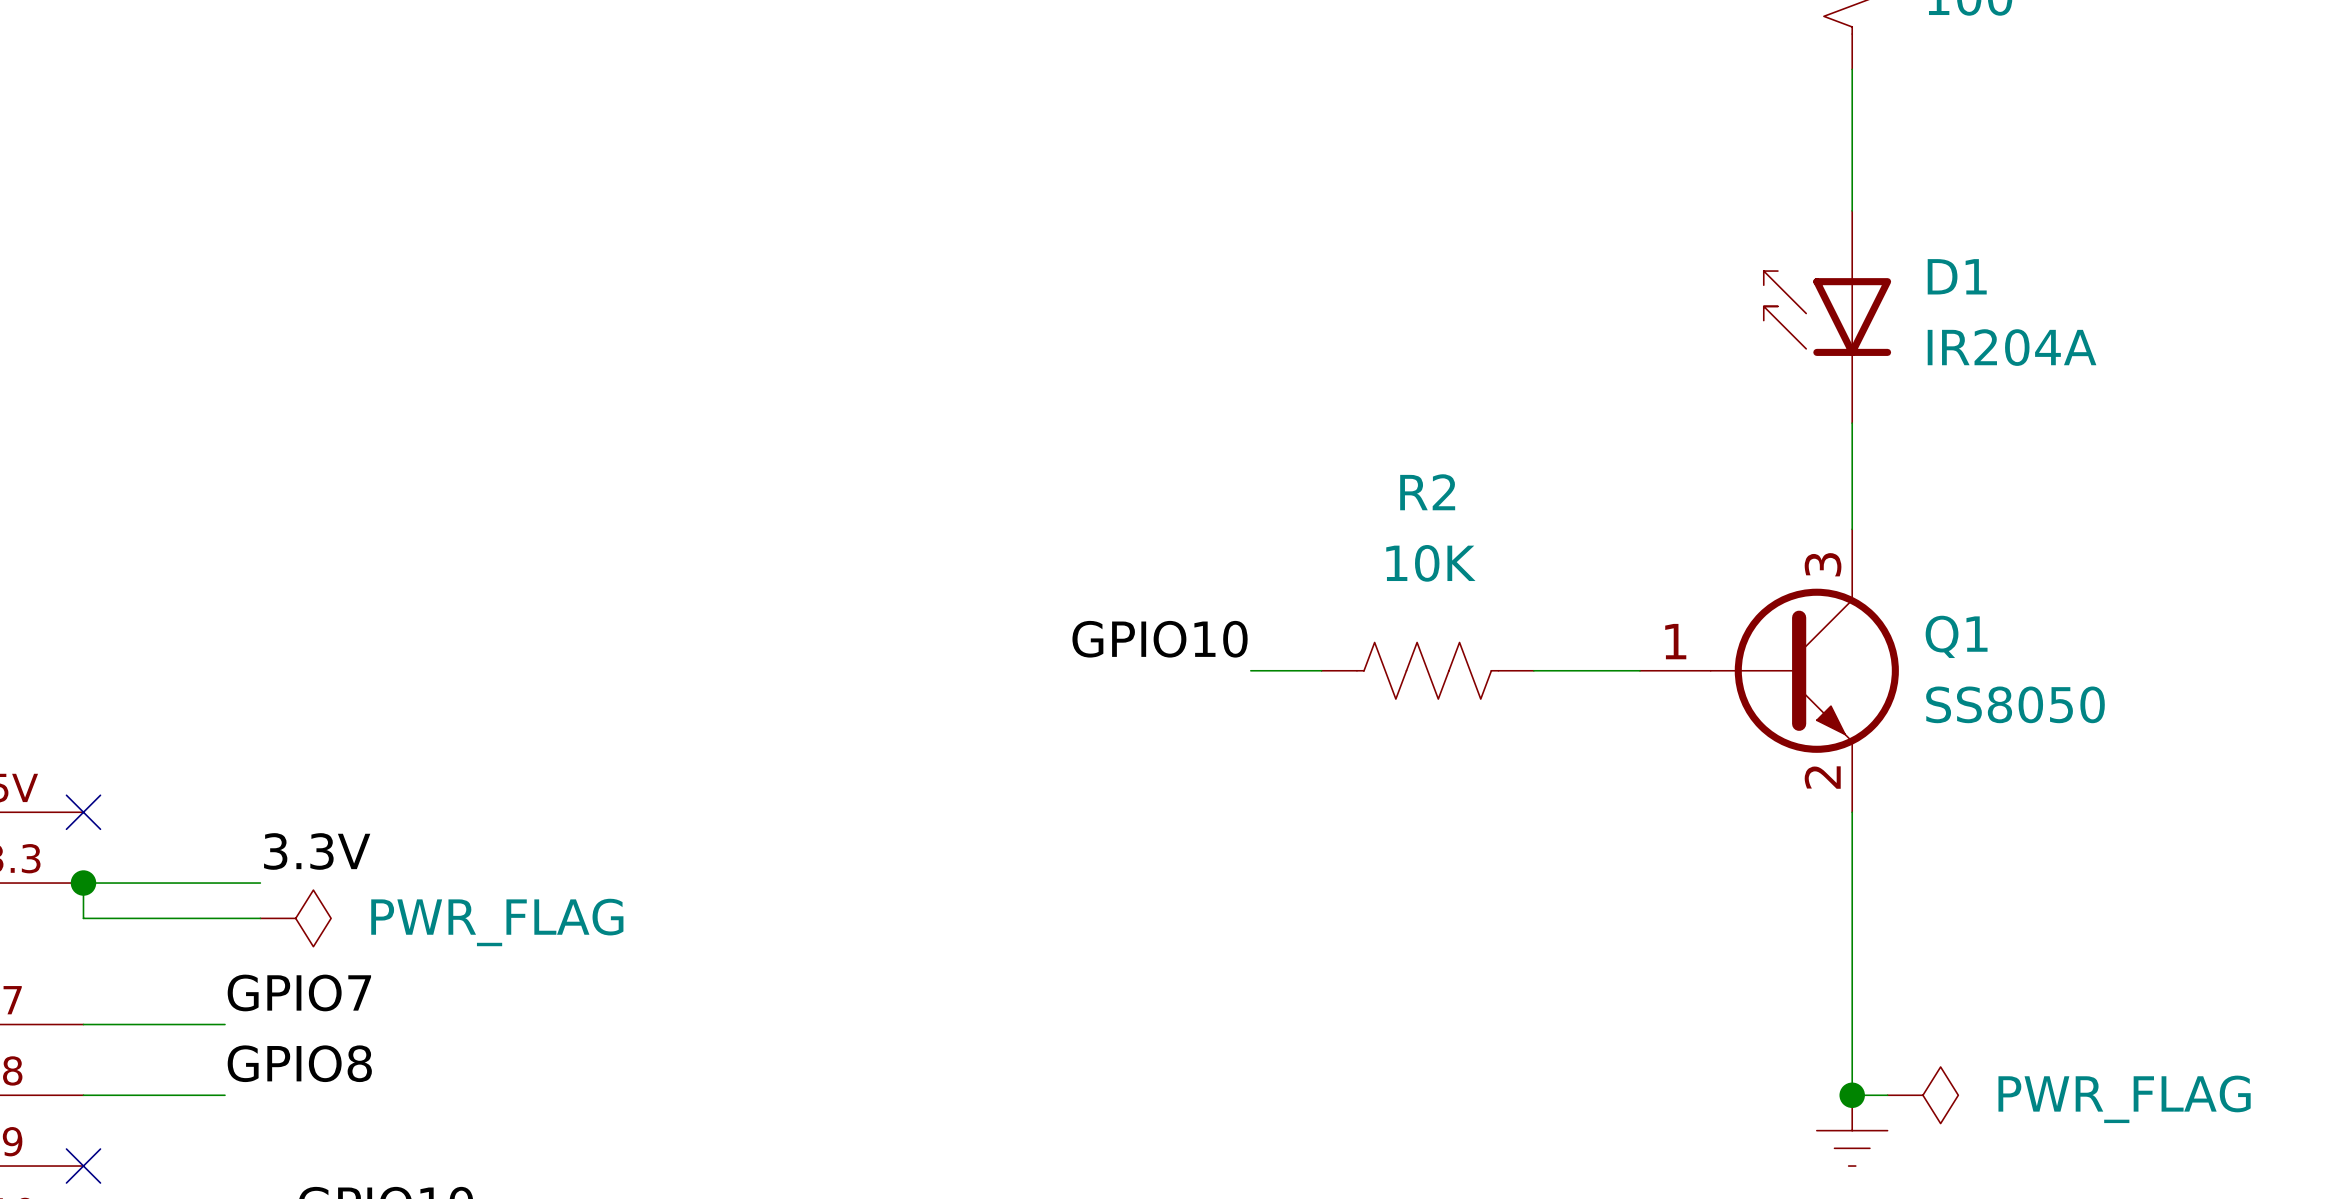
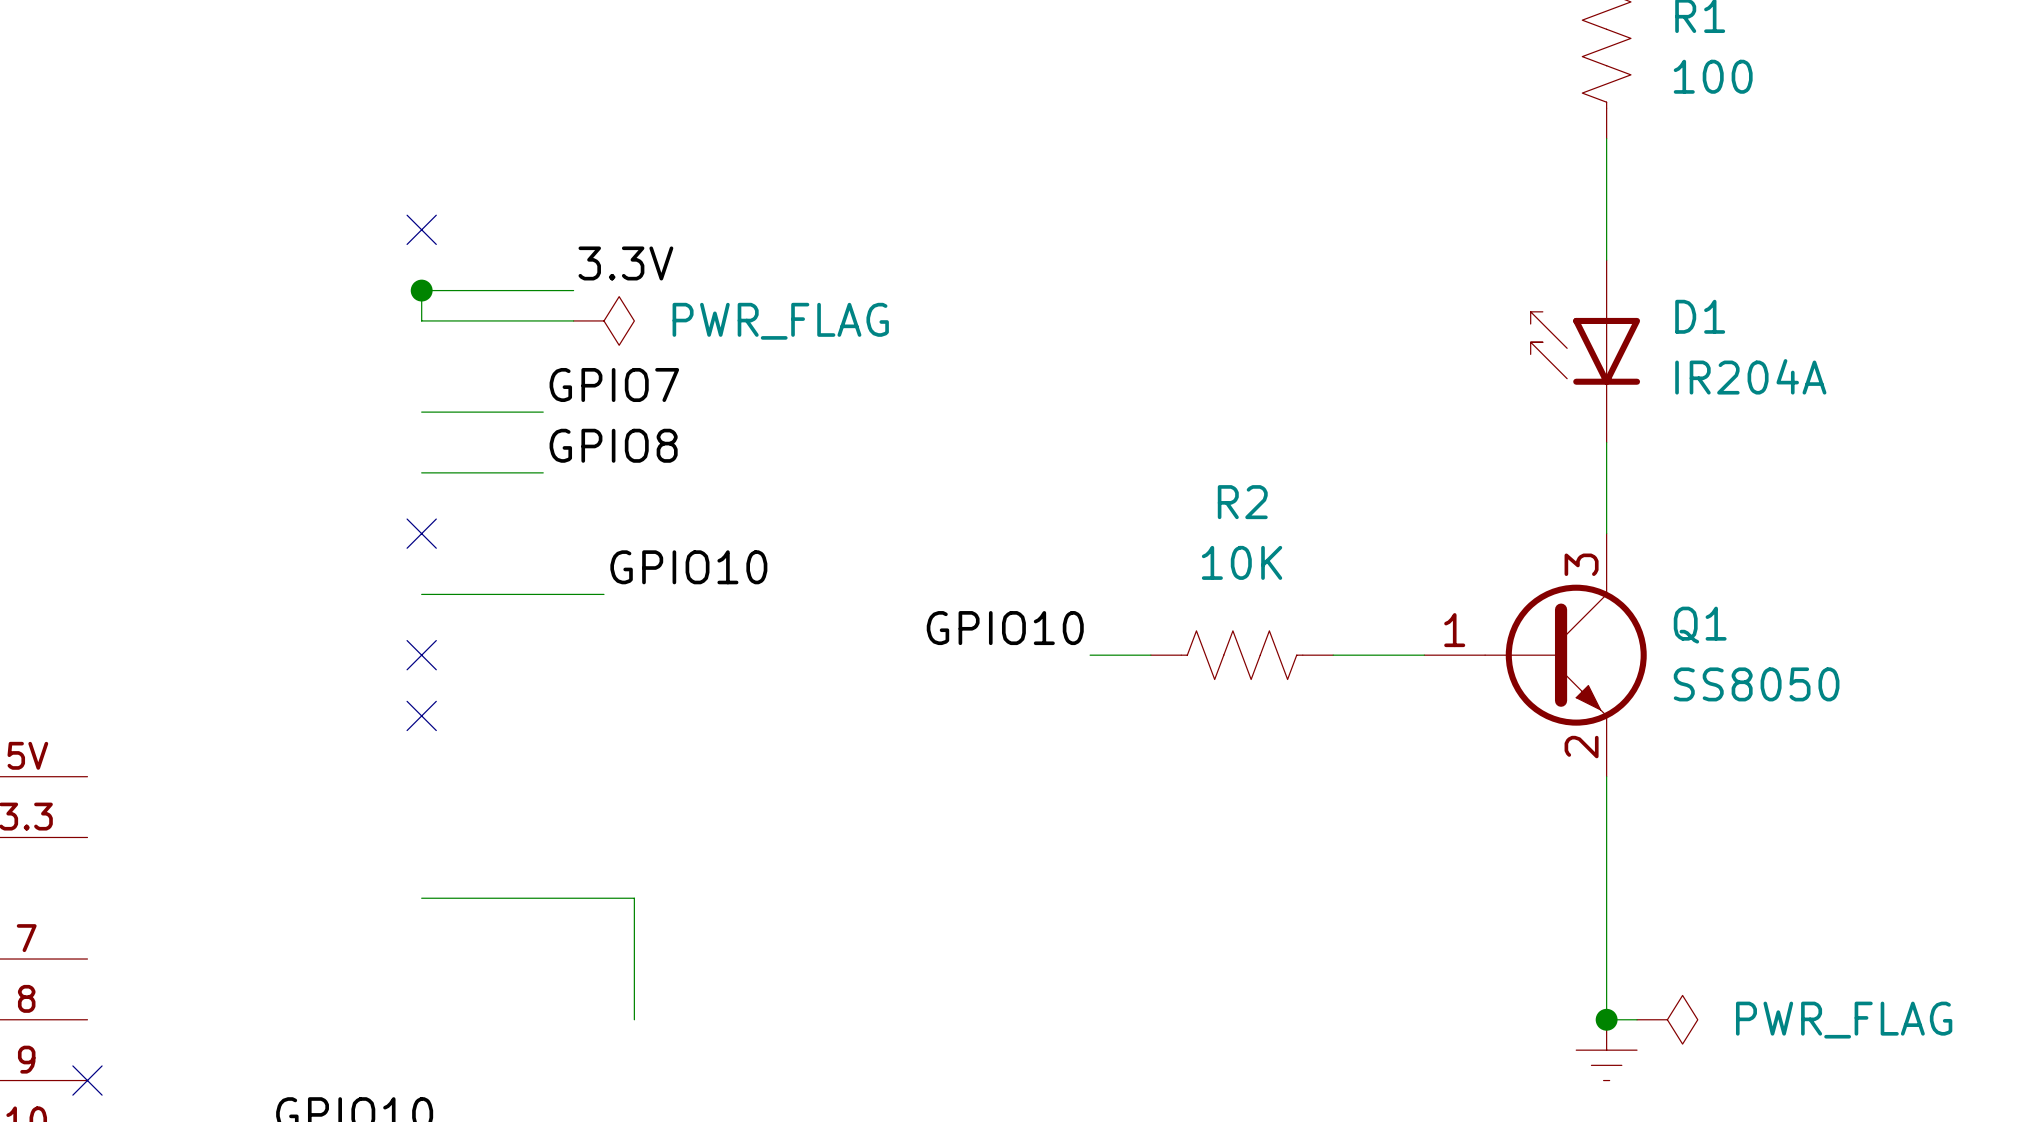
no-connect mark: none -> (421, 229)
label: none -> 3.3V (625, 263)
junction: none -> (421, 290)
wire: none -> (573, 290) (421, 290) (421, 320) (573, 320)
power symbol: none -> PWR_FLAG (603, 320)
label: none -> GPIO7 (614, 384)
wire: none -> (421, 412) (543, 412)
label: none -> GPIO8 (613, 445)
no-connect mark: none -> (421, 533)
label: none -> GPIO10 (688, 567)
wire: none -> (421, 594) (603, 594)
no-connect mark: none -> (421, 655)
no-connect mark: none -> (421, 715)
no-connect mark: (83, 812) -> none
label: 3.3V (317, 851) -> none
junction: (83, 883) -> none
wire: (260, 883) (83, 883) (83, 918) (260, 918) -> none
power symbol: PWR_FLAG (295, 918) -> none
wire: none -> (421, 898) (634, 898) (634, 1019)
label: GPIO7 (299, 992) -> none
wire: (83, 1024) (224, 1024) -> (421, 472) (543, 472)
label: GPIO8 (299, 1063) -> none
wire: (83, 1095) (224, 1095) -> none

